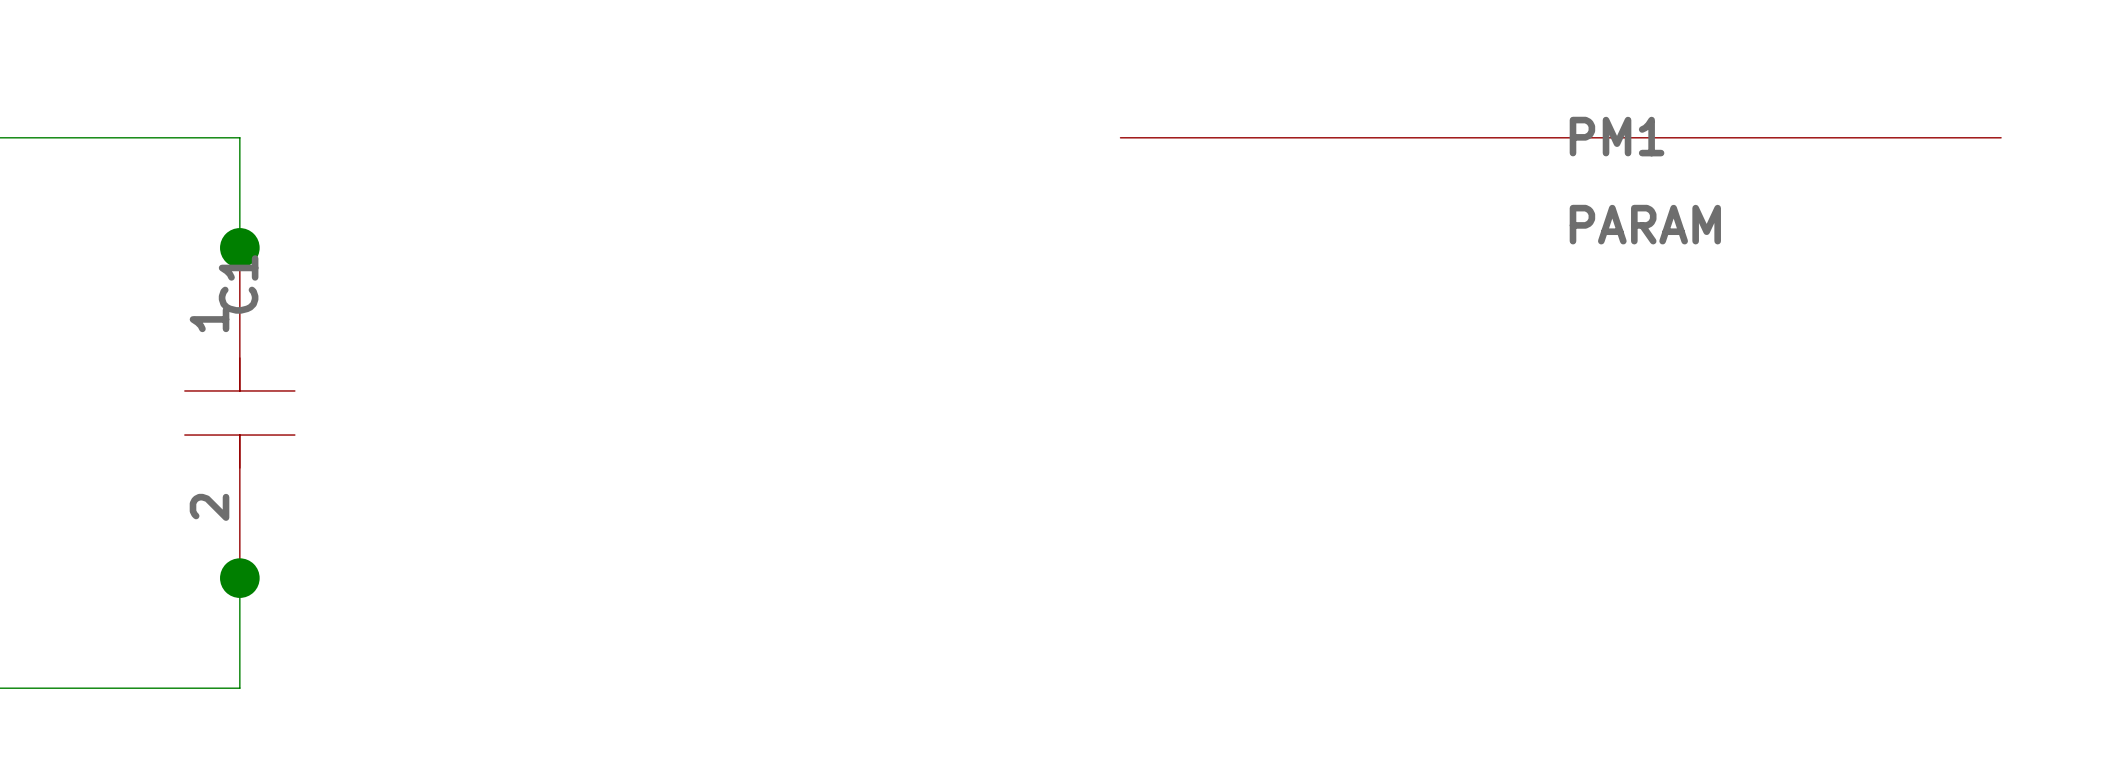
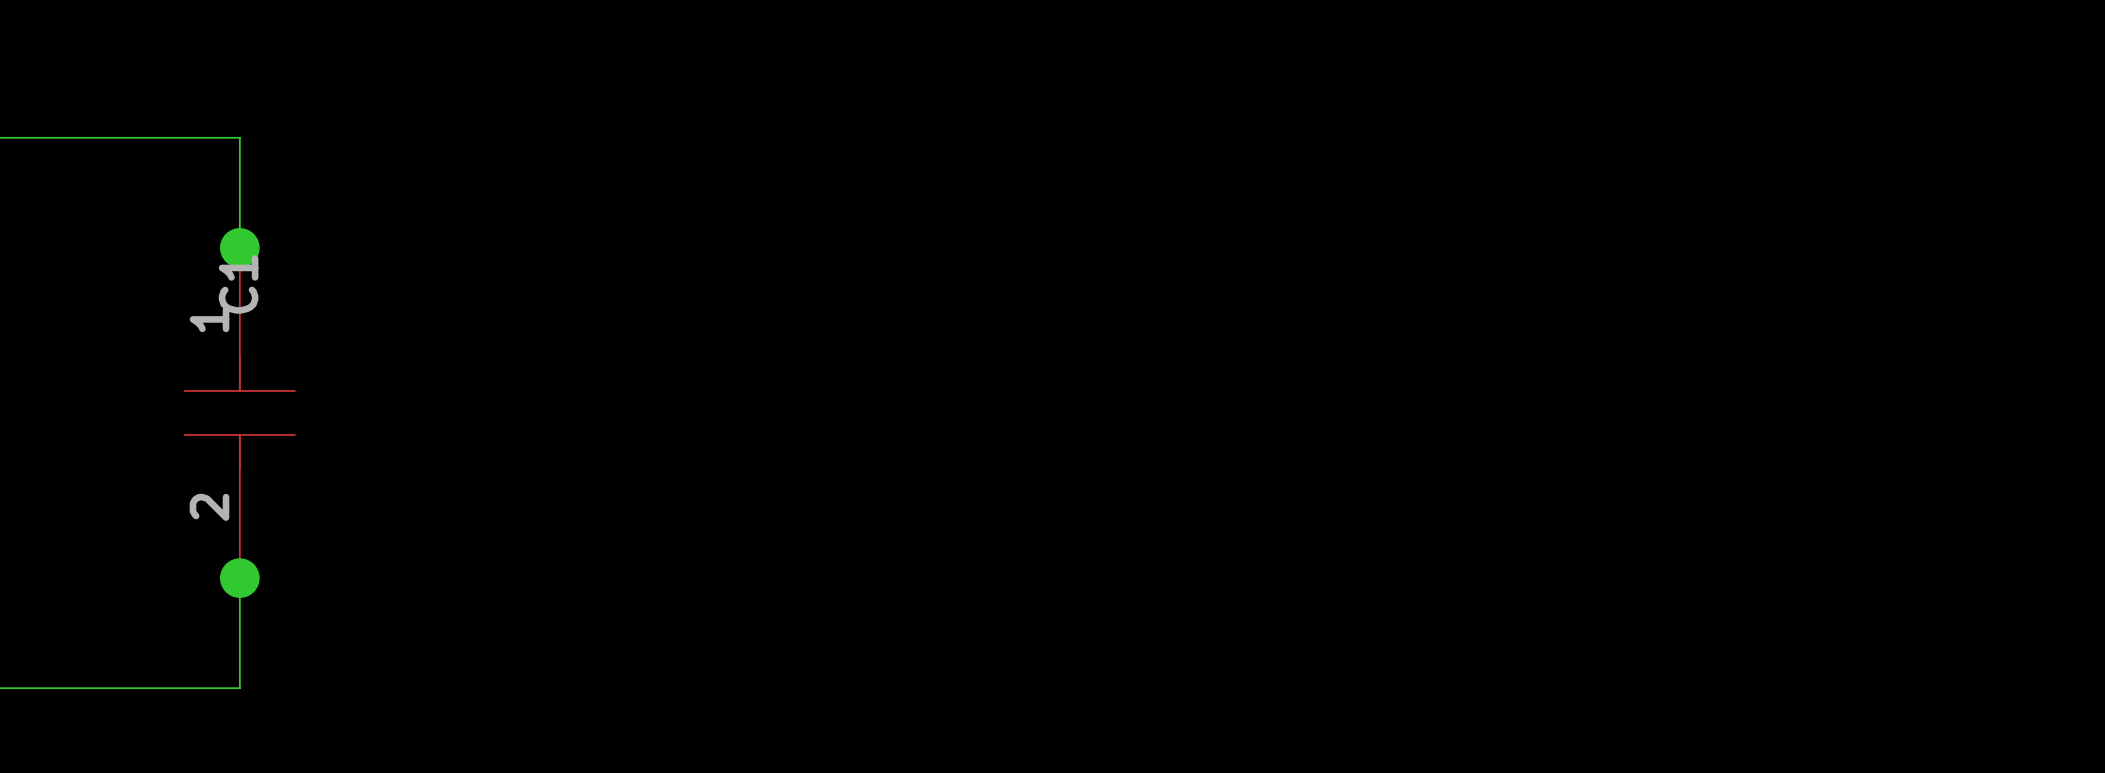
PM1: PARAM (1560, 137) -> none

